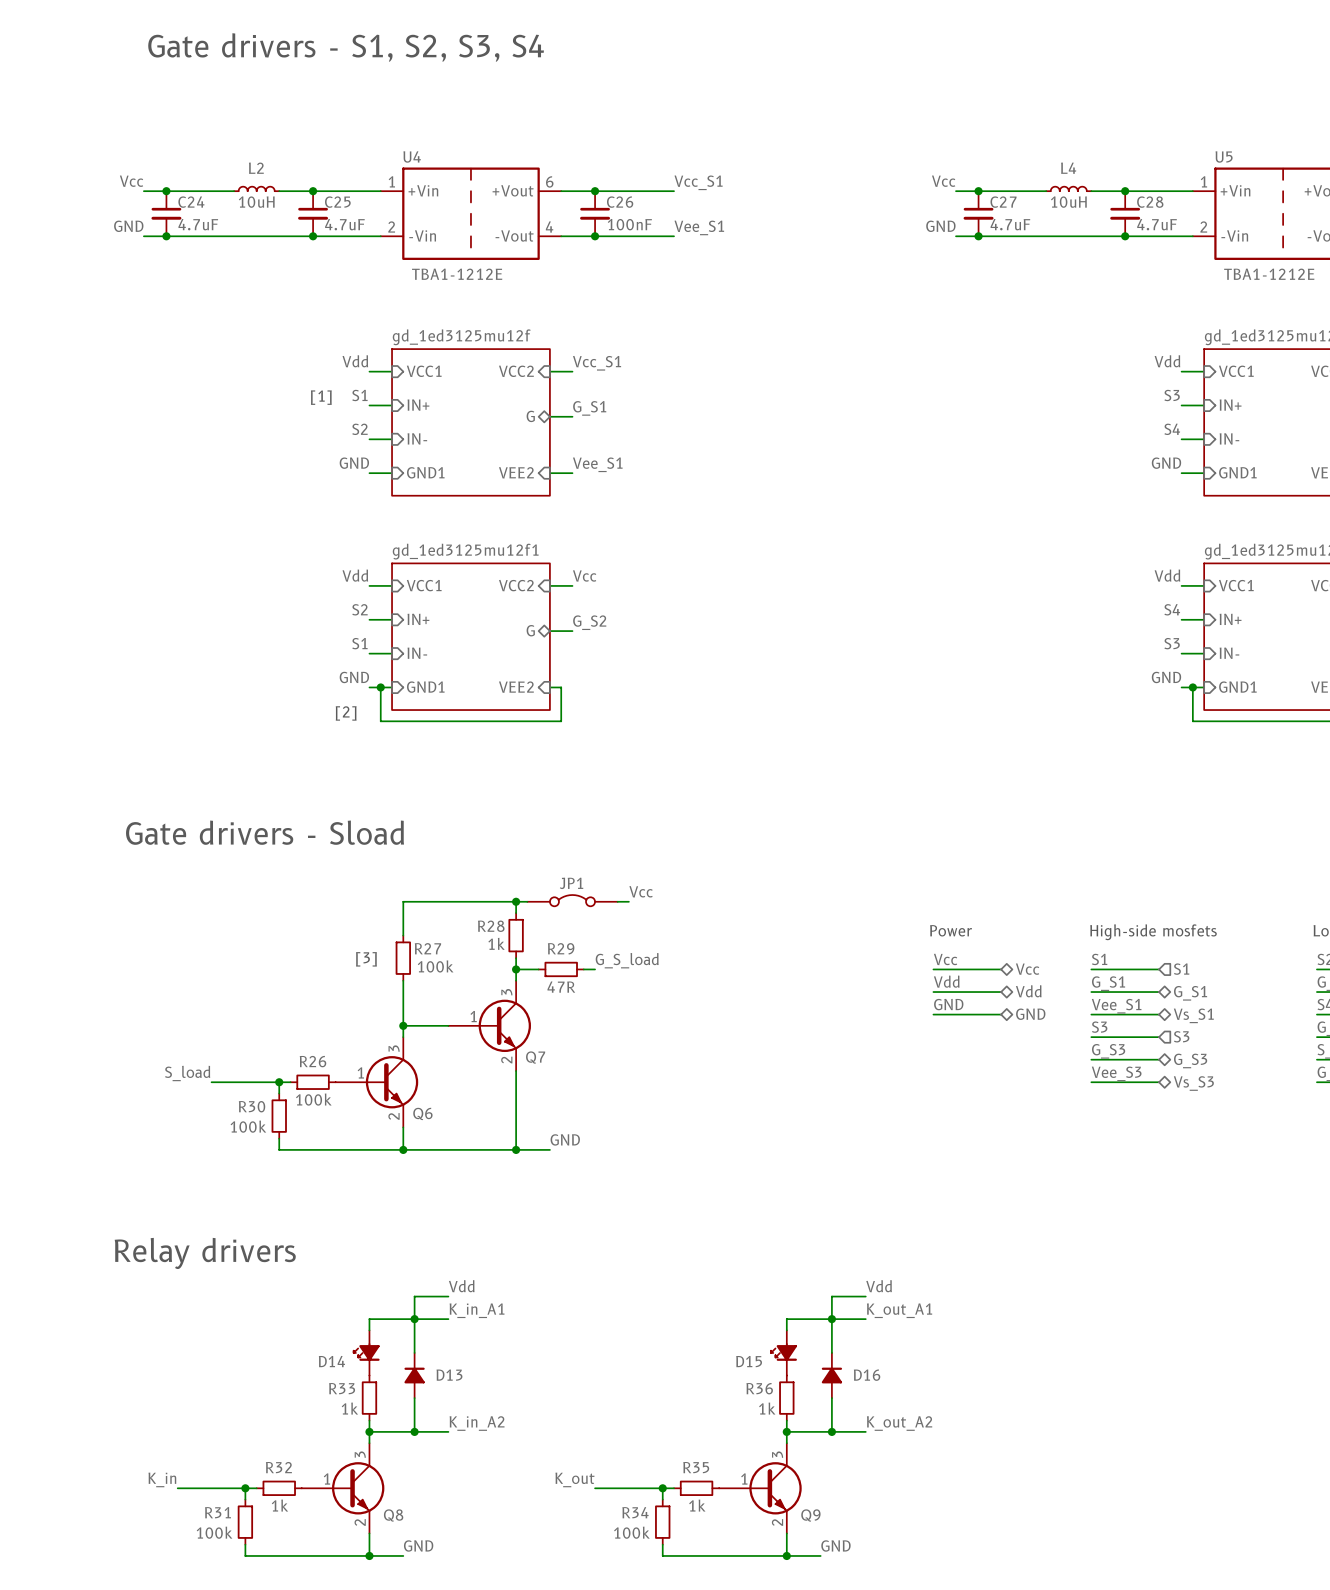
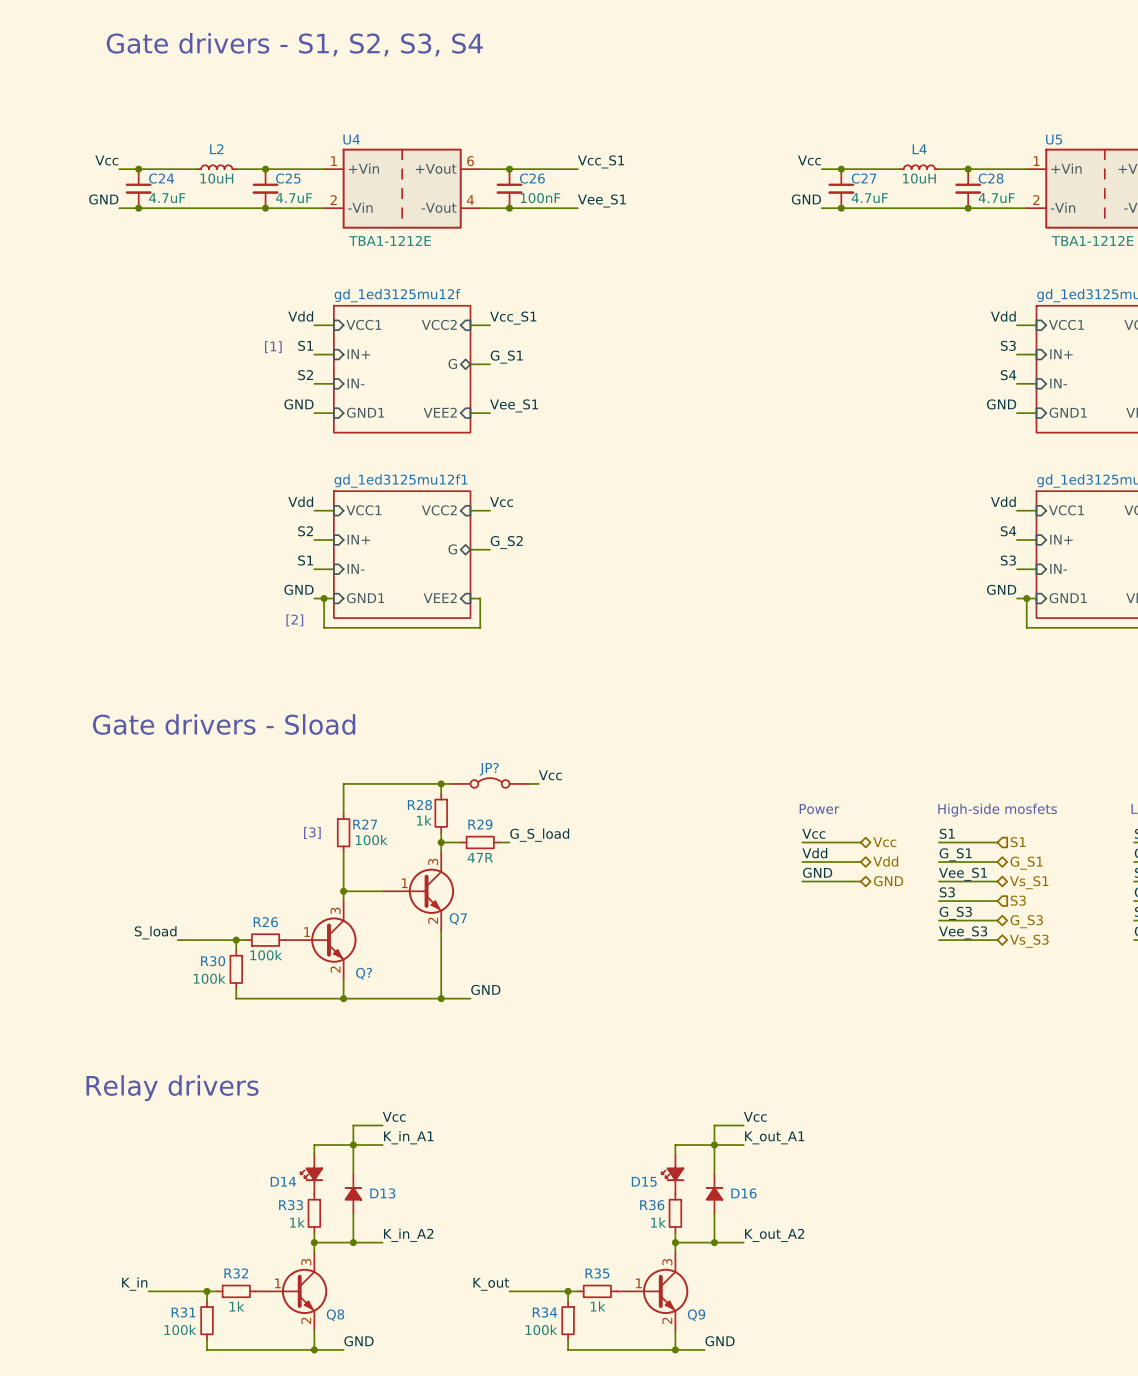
JP1 name: JP1 (571, 883) -> JP? (489, 769)
Q6 name: Q6 (422, 1113) -> Q? (364, 973)
label: Vdd (461, 1286) -> Vcc (394, 1116)
label: Vdd (879, 1286) -> Vcc (755, 1116)

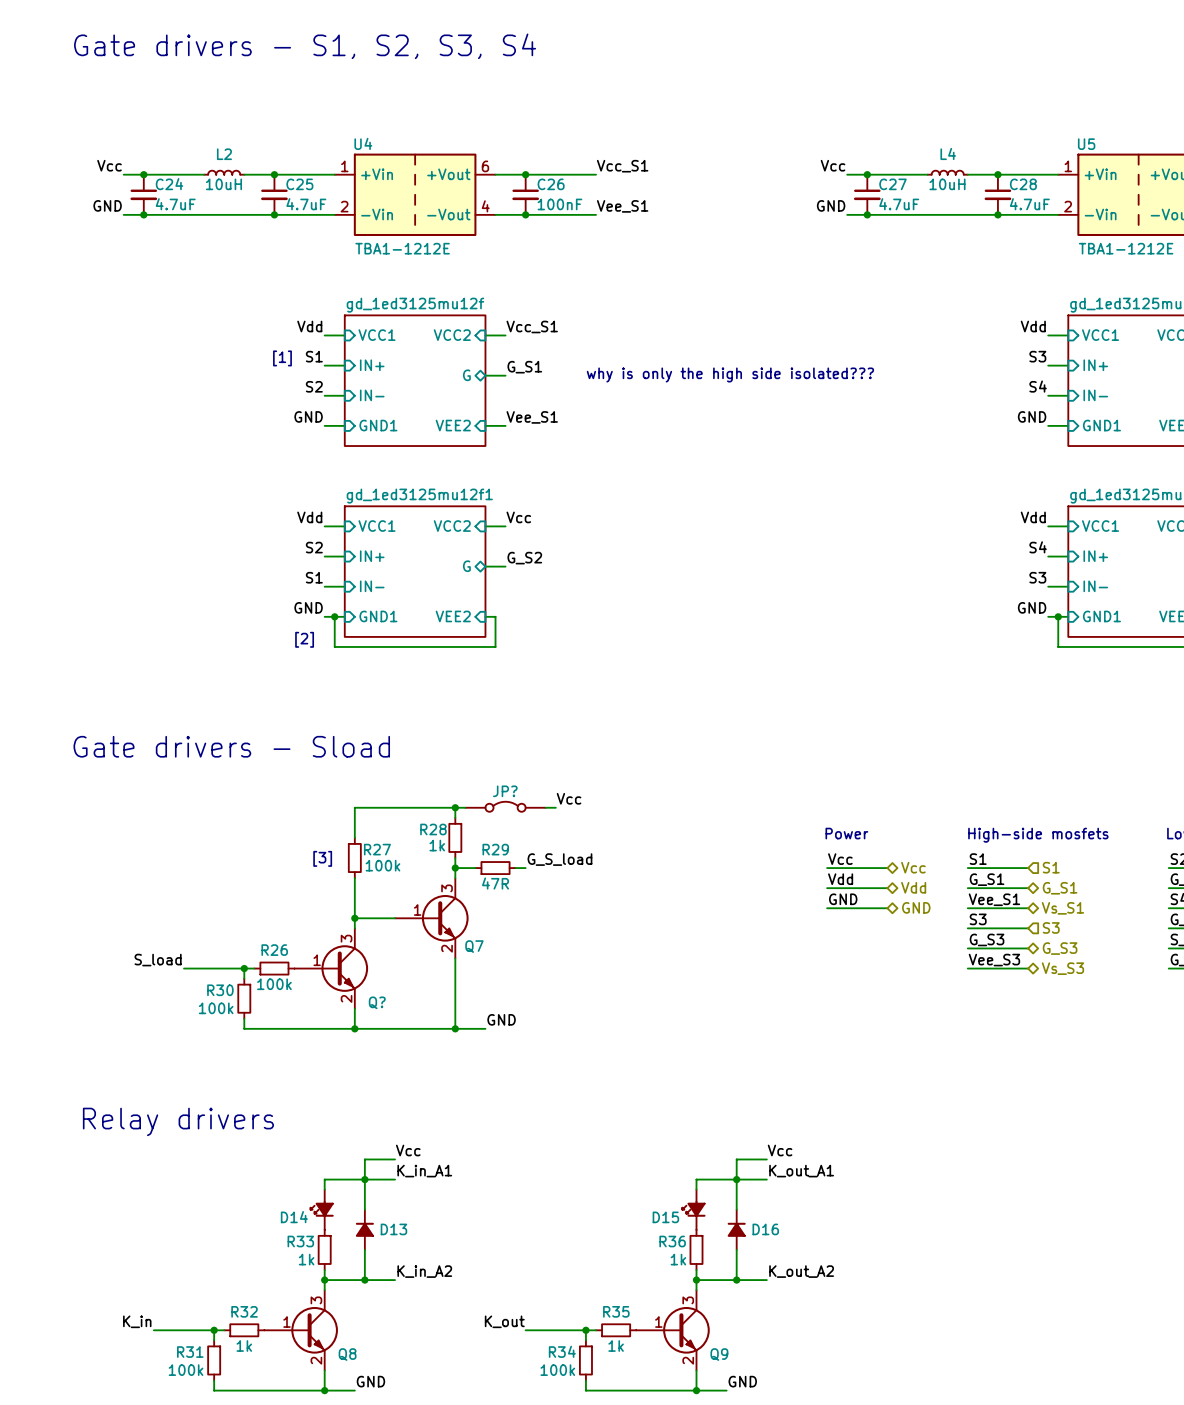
text: none -> why is only the high side isolated??? (730, 374)

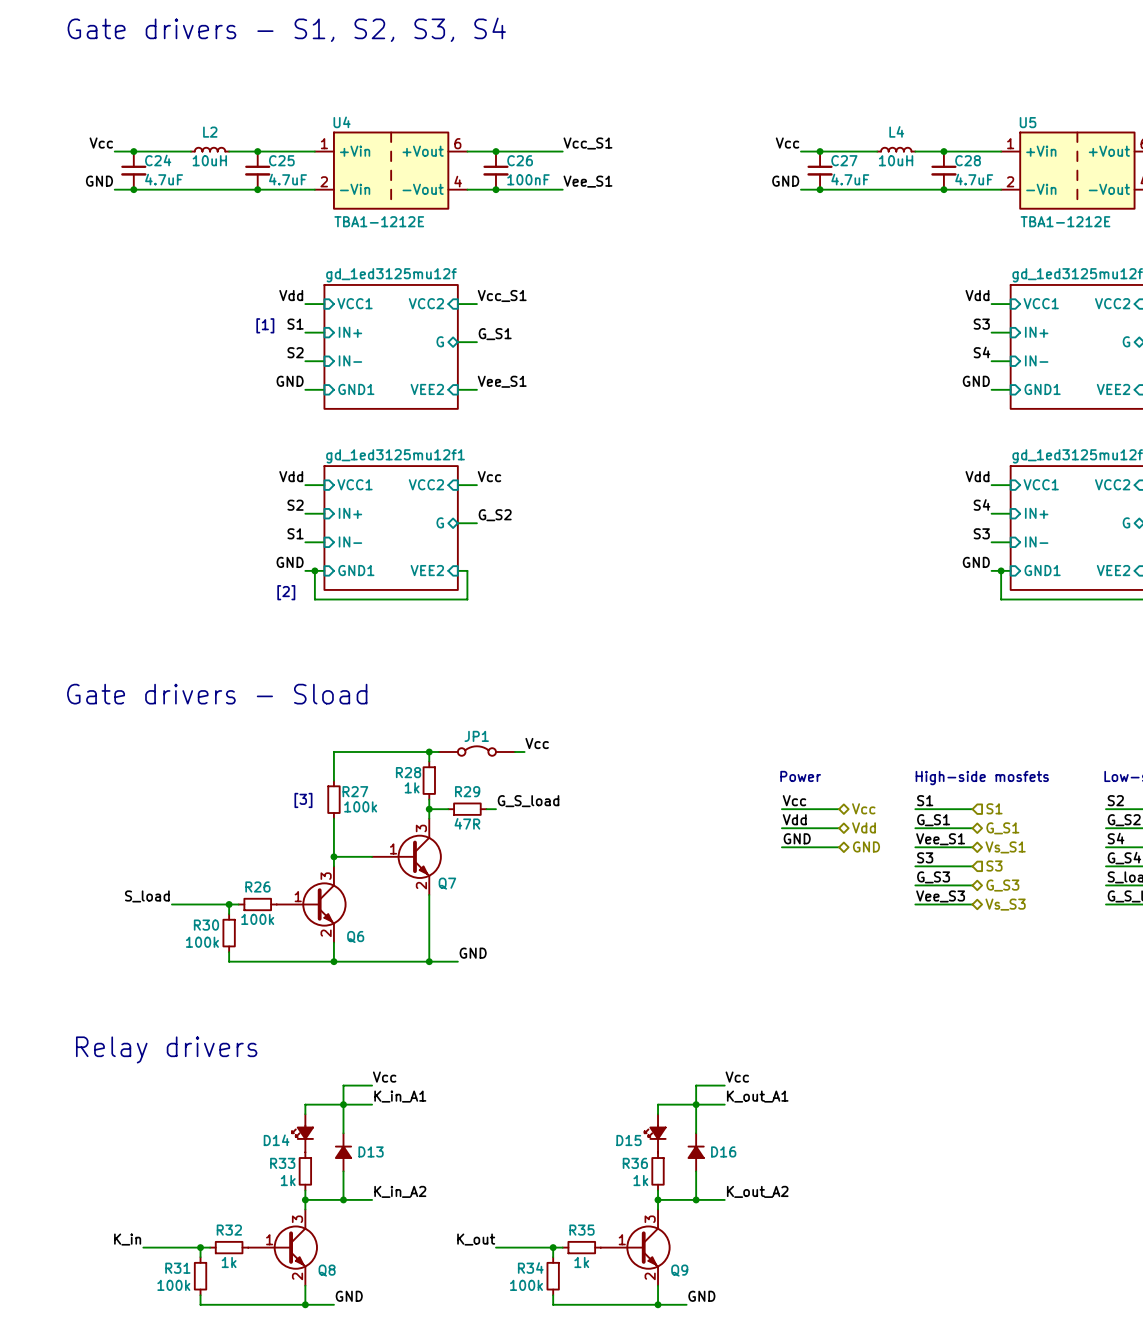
text: why is only the high side isolated??? (730, 374) -> none
JP? name: JP? (505, 791) -> JP1 (476, 736)
Q? name: Q? (377, 1002) -> Q6 (355, 936)

